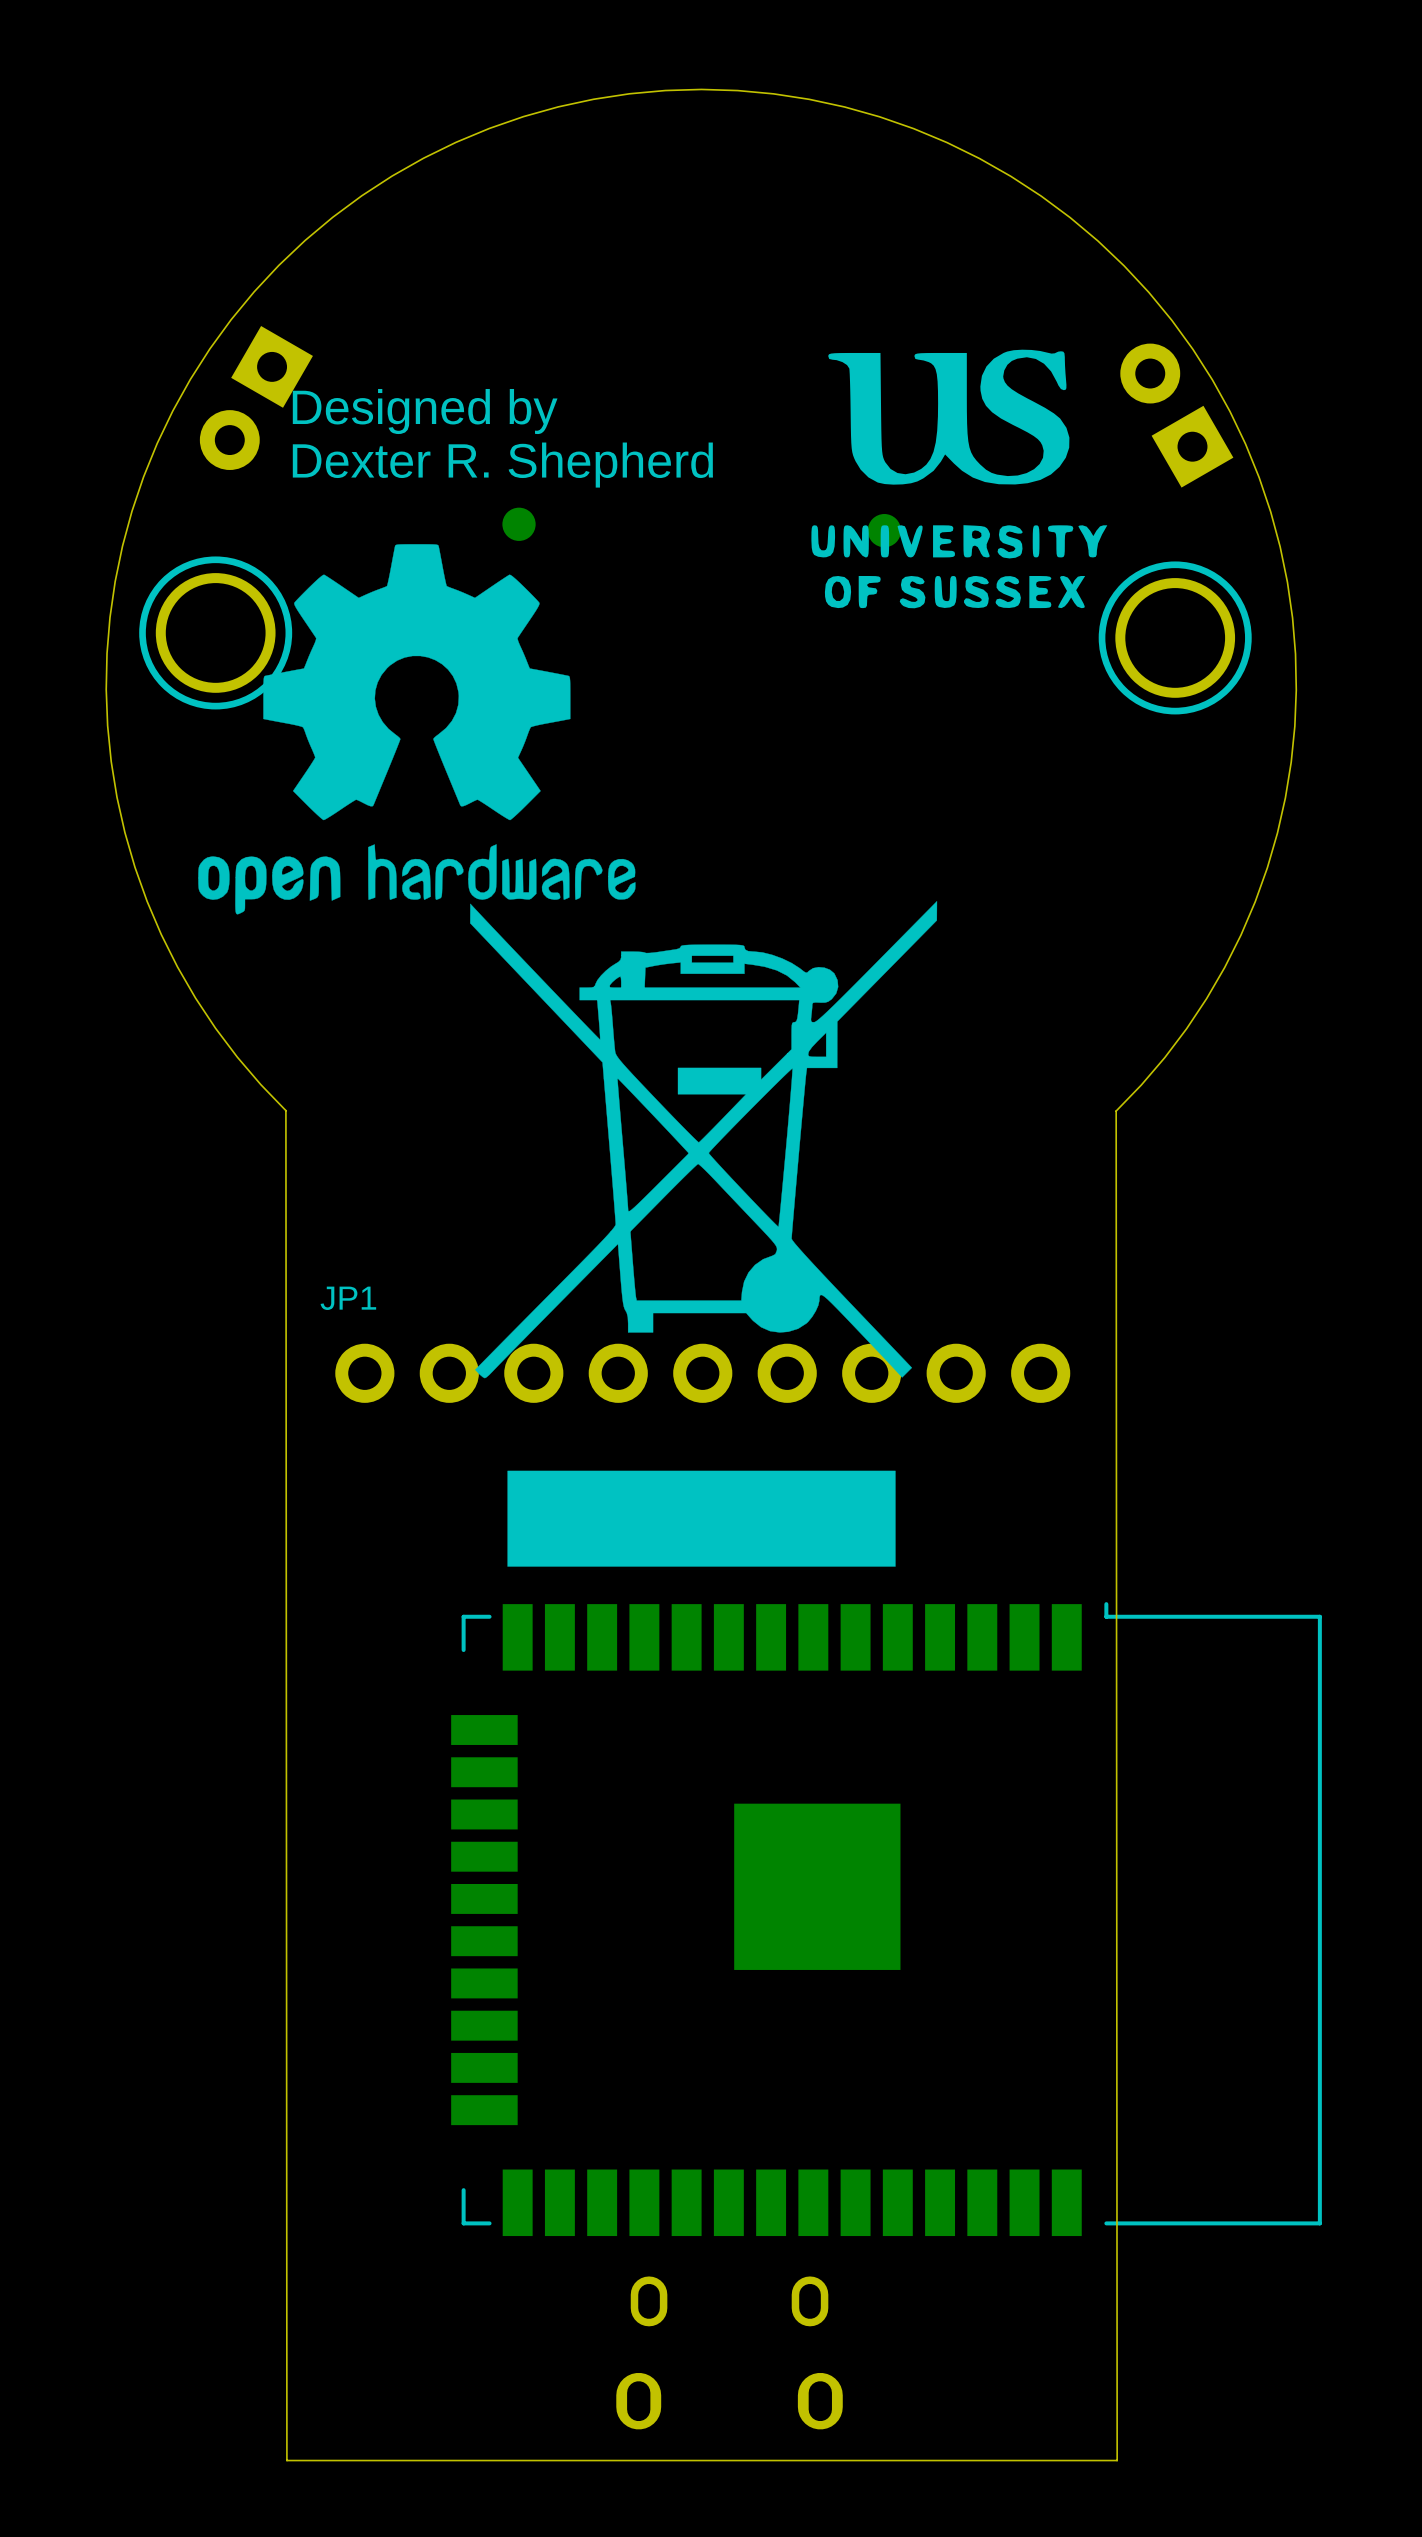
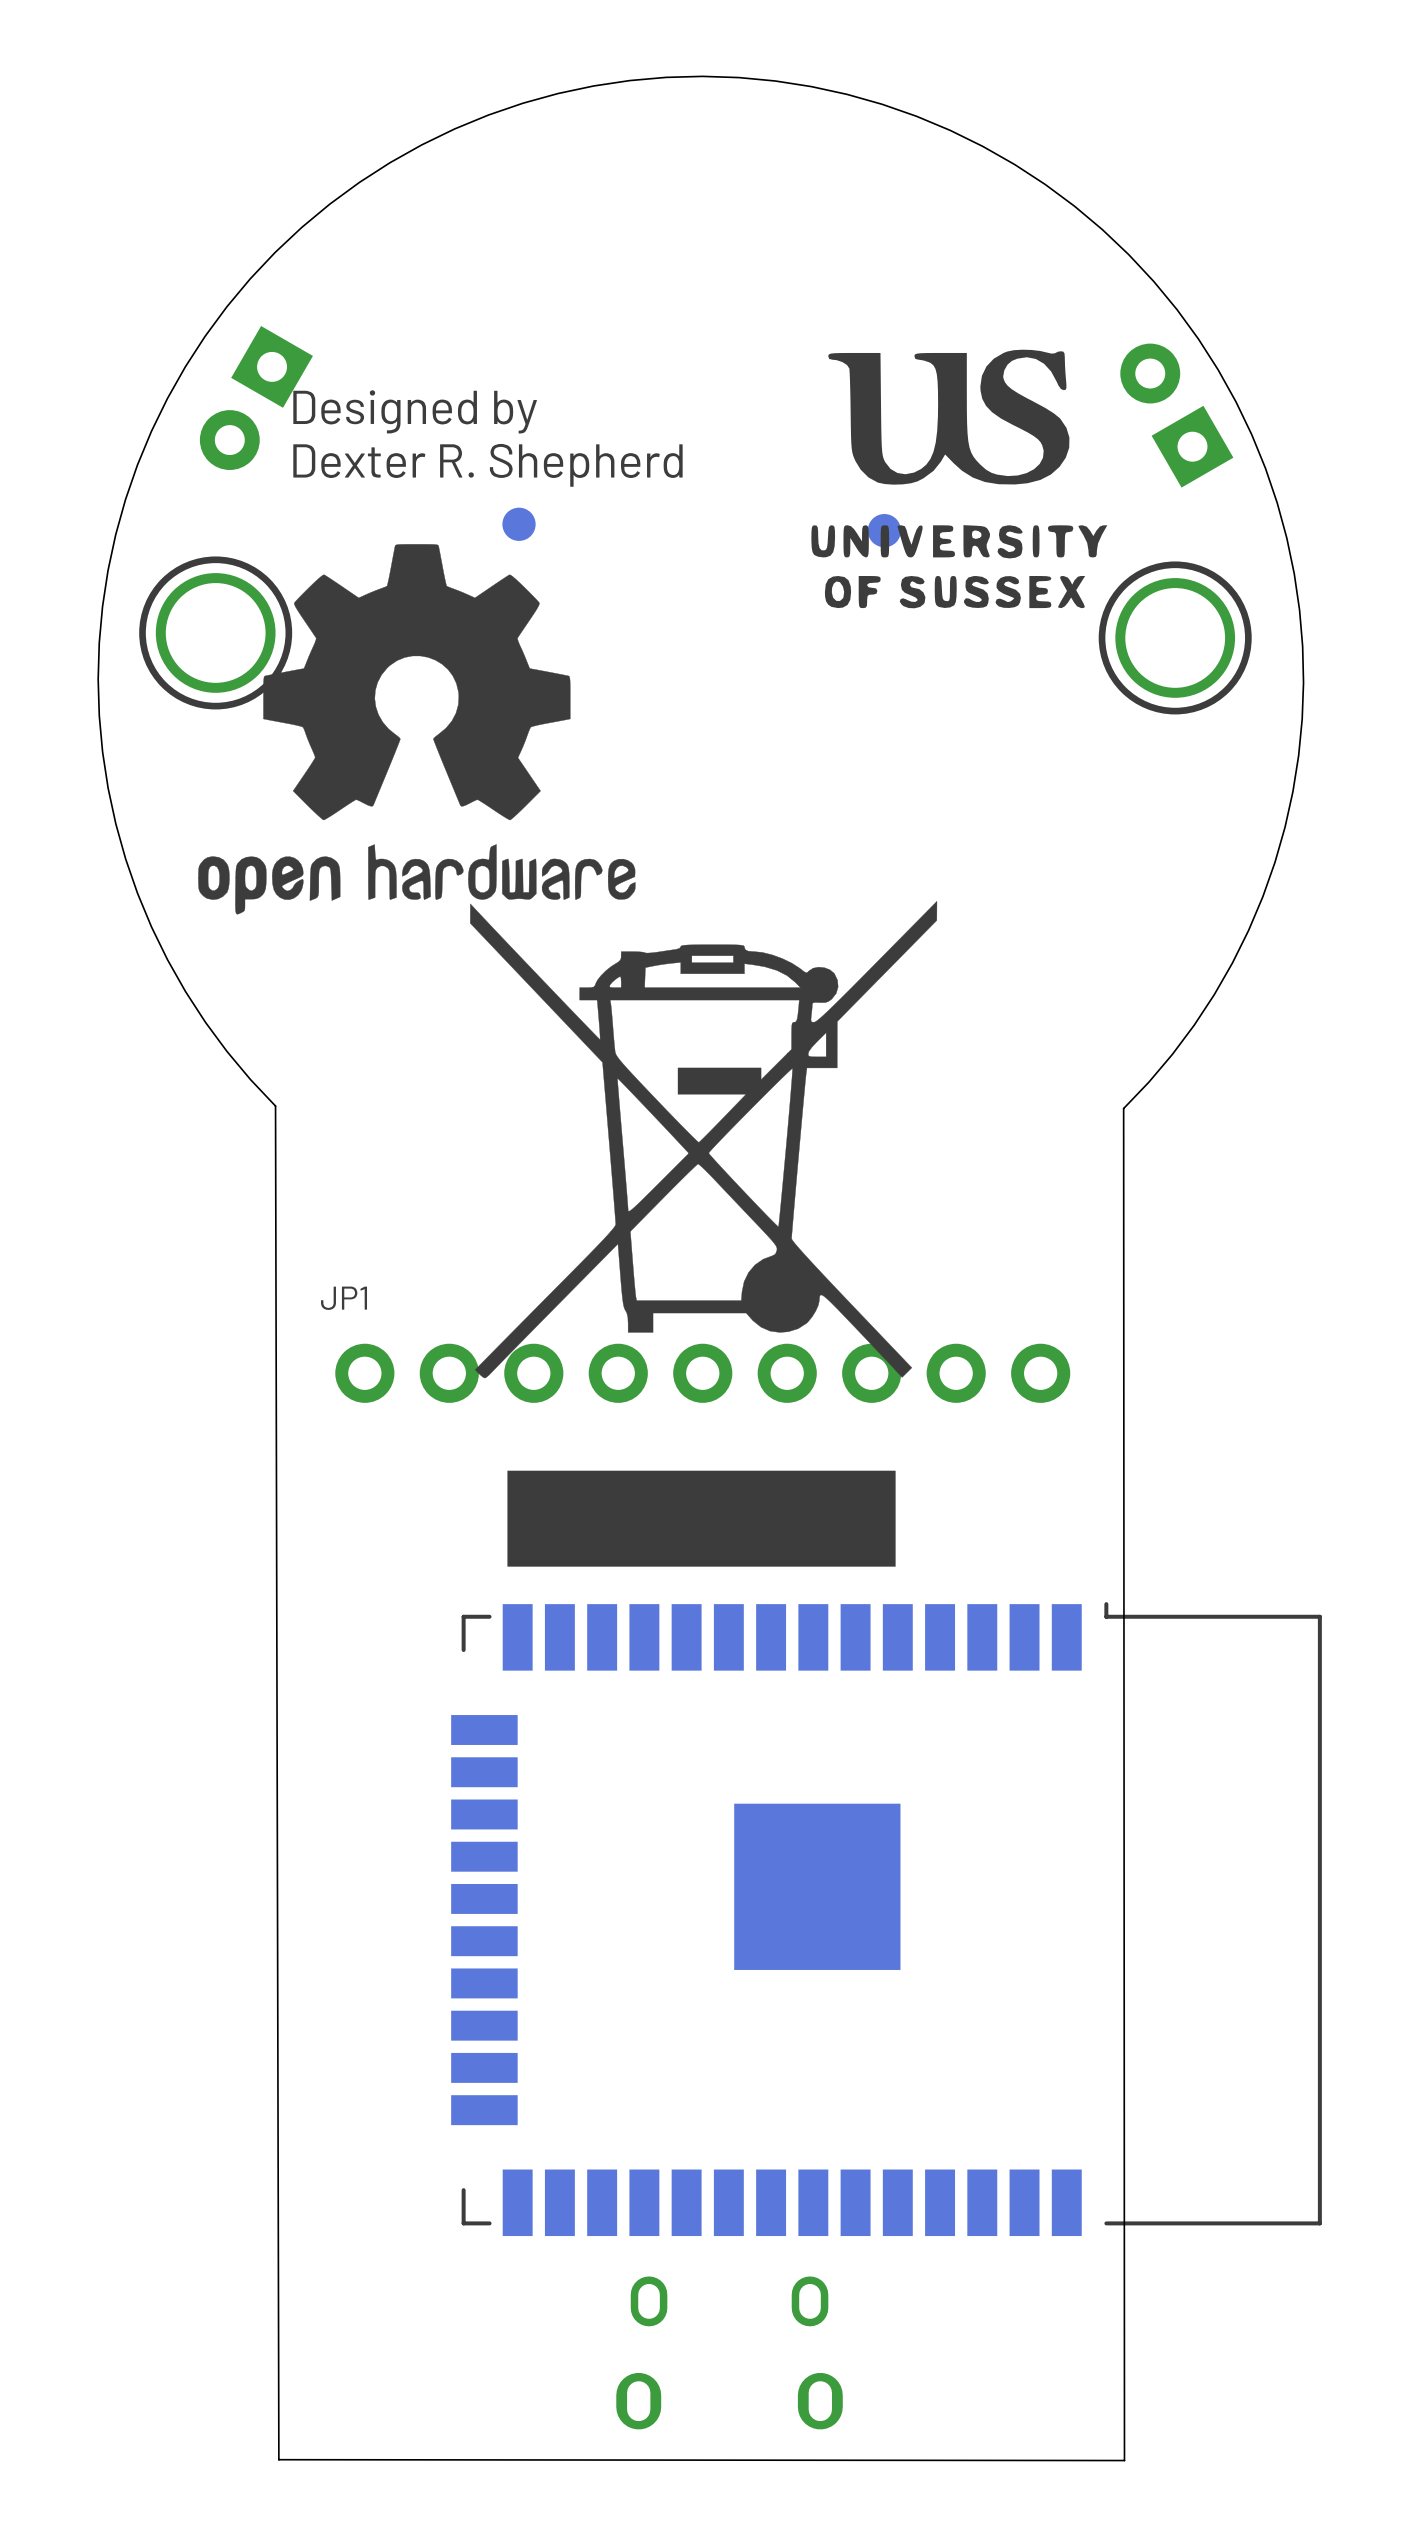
board edge: (285, 1110) (286, 2460) (1117, 2460) (1116, 1111) (1164, 1057) (1206, 998) (1240, 935) (1255, 901) (1277, 833) (1285, 797) (1291, 762) (1296, 690) (1295, 653) (1287, 582) (1270, 511) (1259, 477) (1229, 411) (1192, 349) (1171, 320) (1124, 265) (1097, 240) (1041, 196) (979, 158) (913, 128) (879, 116) (809, 99) (773, 93) (701, 89) (629, 93) (593, 99) (523, 116) (456, 142) (392, 176) (361, 195) (332, 217) (278, 265) (231, 319) (209, 348) (172, 410) (157, 443) (131, 511) (115, 581) (110, 617) (106, 689) (111, 761) (124, 832) (134, 867) (161, 934) (177, 966) (215, 1028) (260, 1084) (285, 1110) -> (275, 1106) (278, 2459) (1124, 2460) (1123, 1108) (1172, 1054) (1214, 994) (1248, 930) (1262, 896) (1275, 862) (1292, 791) (1302, 719) (1303, 682) (1299, 609) (1286, 538) (1277, 502) (1251, 434) (1218, 369) (1198, 339) (1177, 309) (1128, 254) (1102, 229) (1045, 184) (983, 146) (950, 130) (882, 104) (847, 94) (775, 81) (702, 76) (629, 80) (558, 93) (522, 103) (454, 128) (390, 162) (359, 182) (329, 204) (275, 252) (250, 278) (205, 336) (167, 398) (137, 465) (125, 499) (108, 570) (102, 606) (98, 679) (102, 752) (115, 823) (125, 858) (151, 927) (167, 959) (205, 1022) (227, 1051) (275, 1106)

